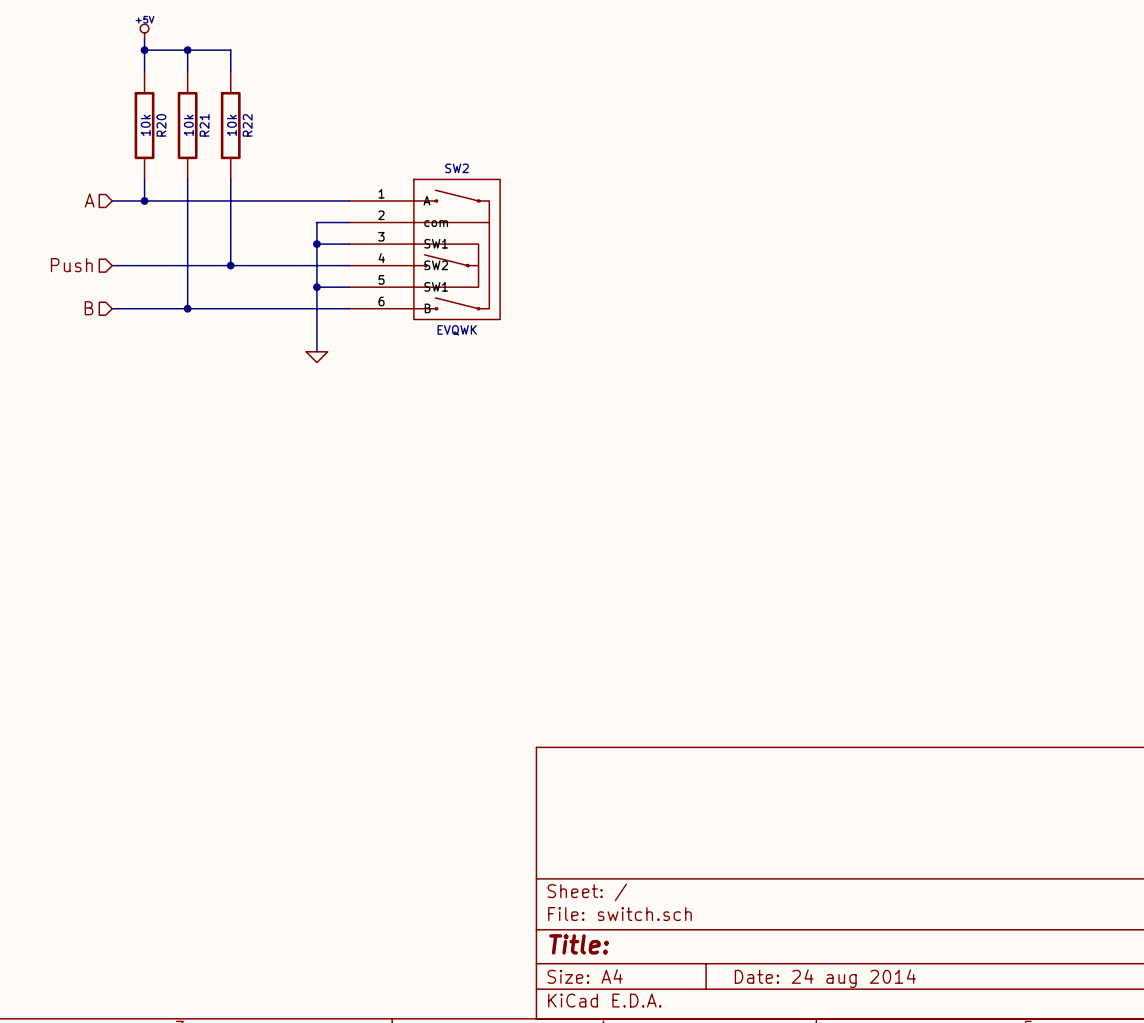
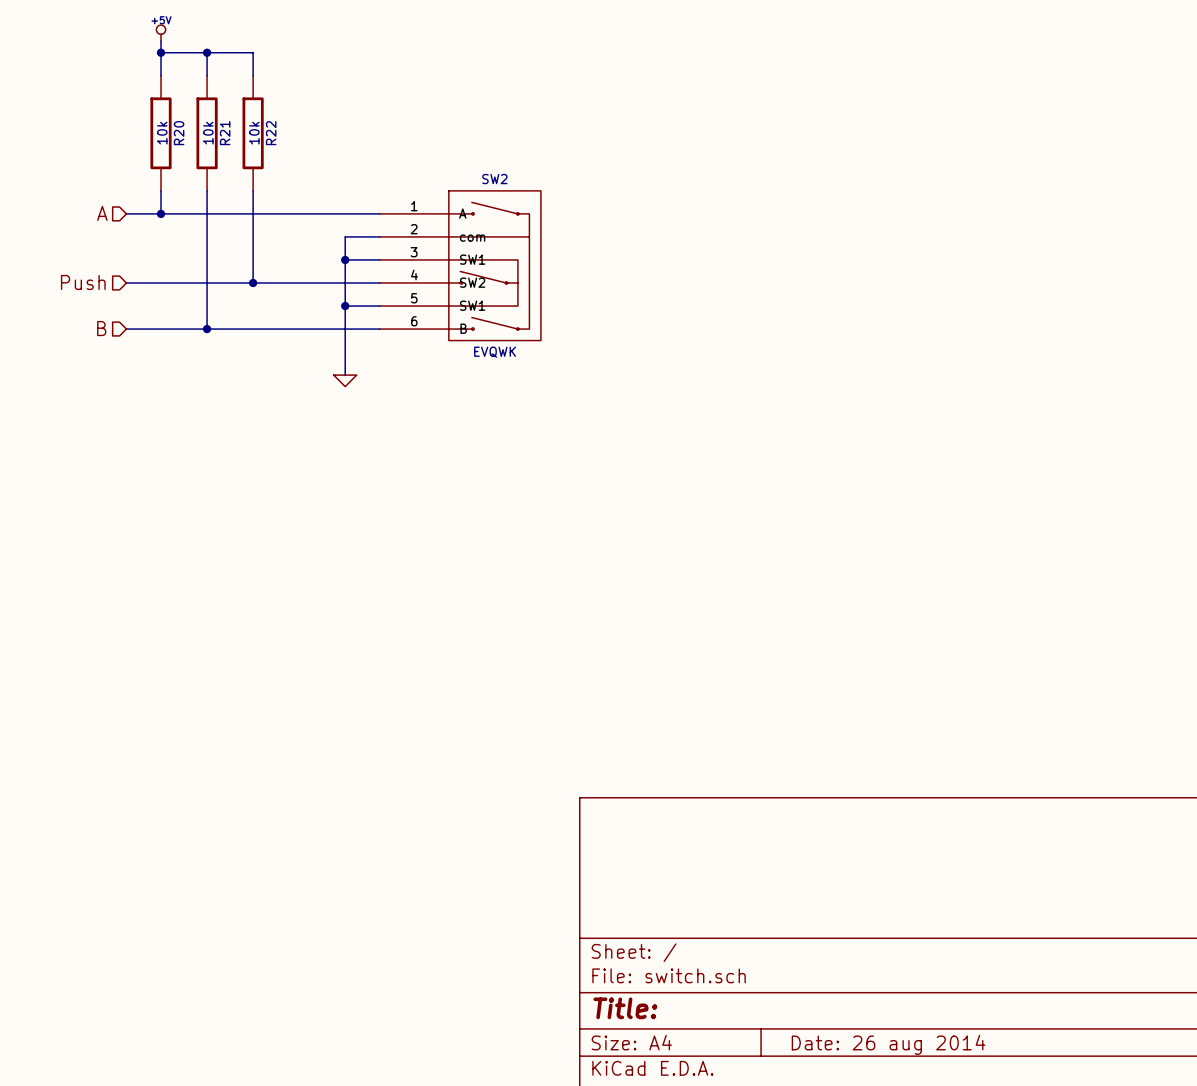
title block: Date: 24 aug 2014 (825, 978) -> Date: 26 aug 2014 (888, 1044)

